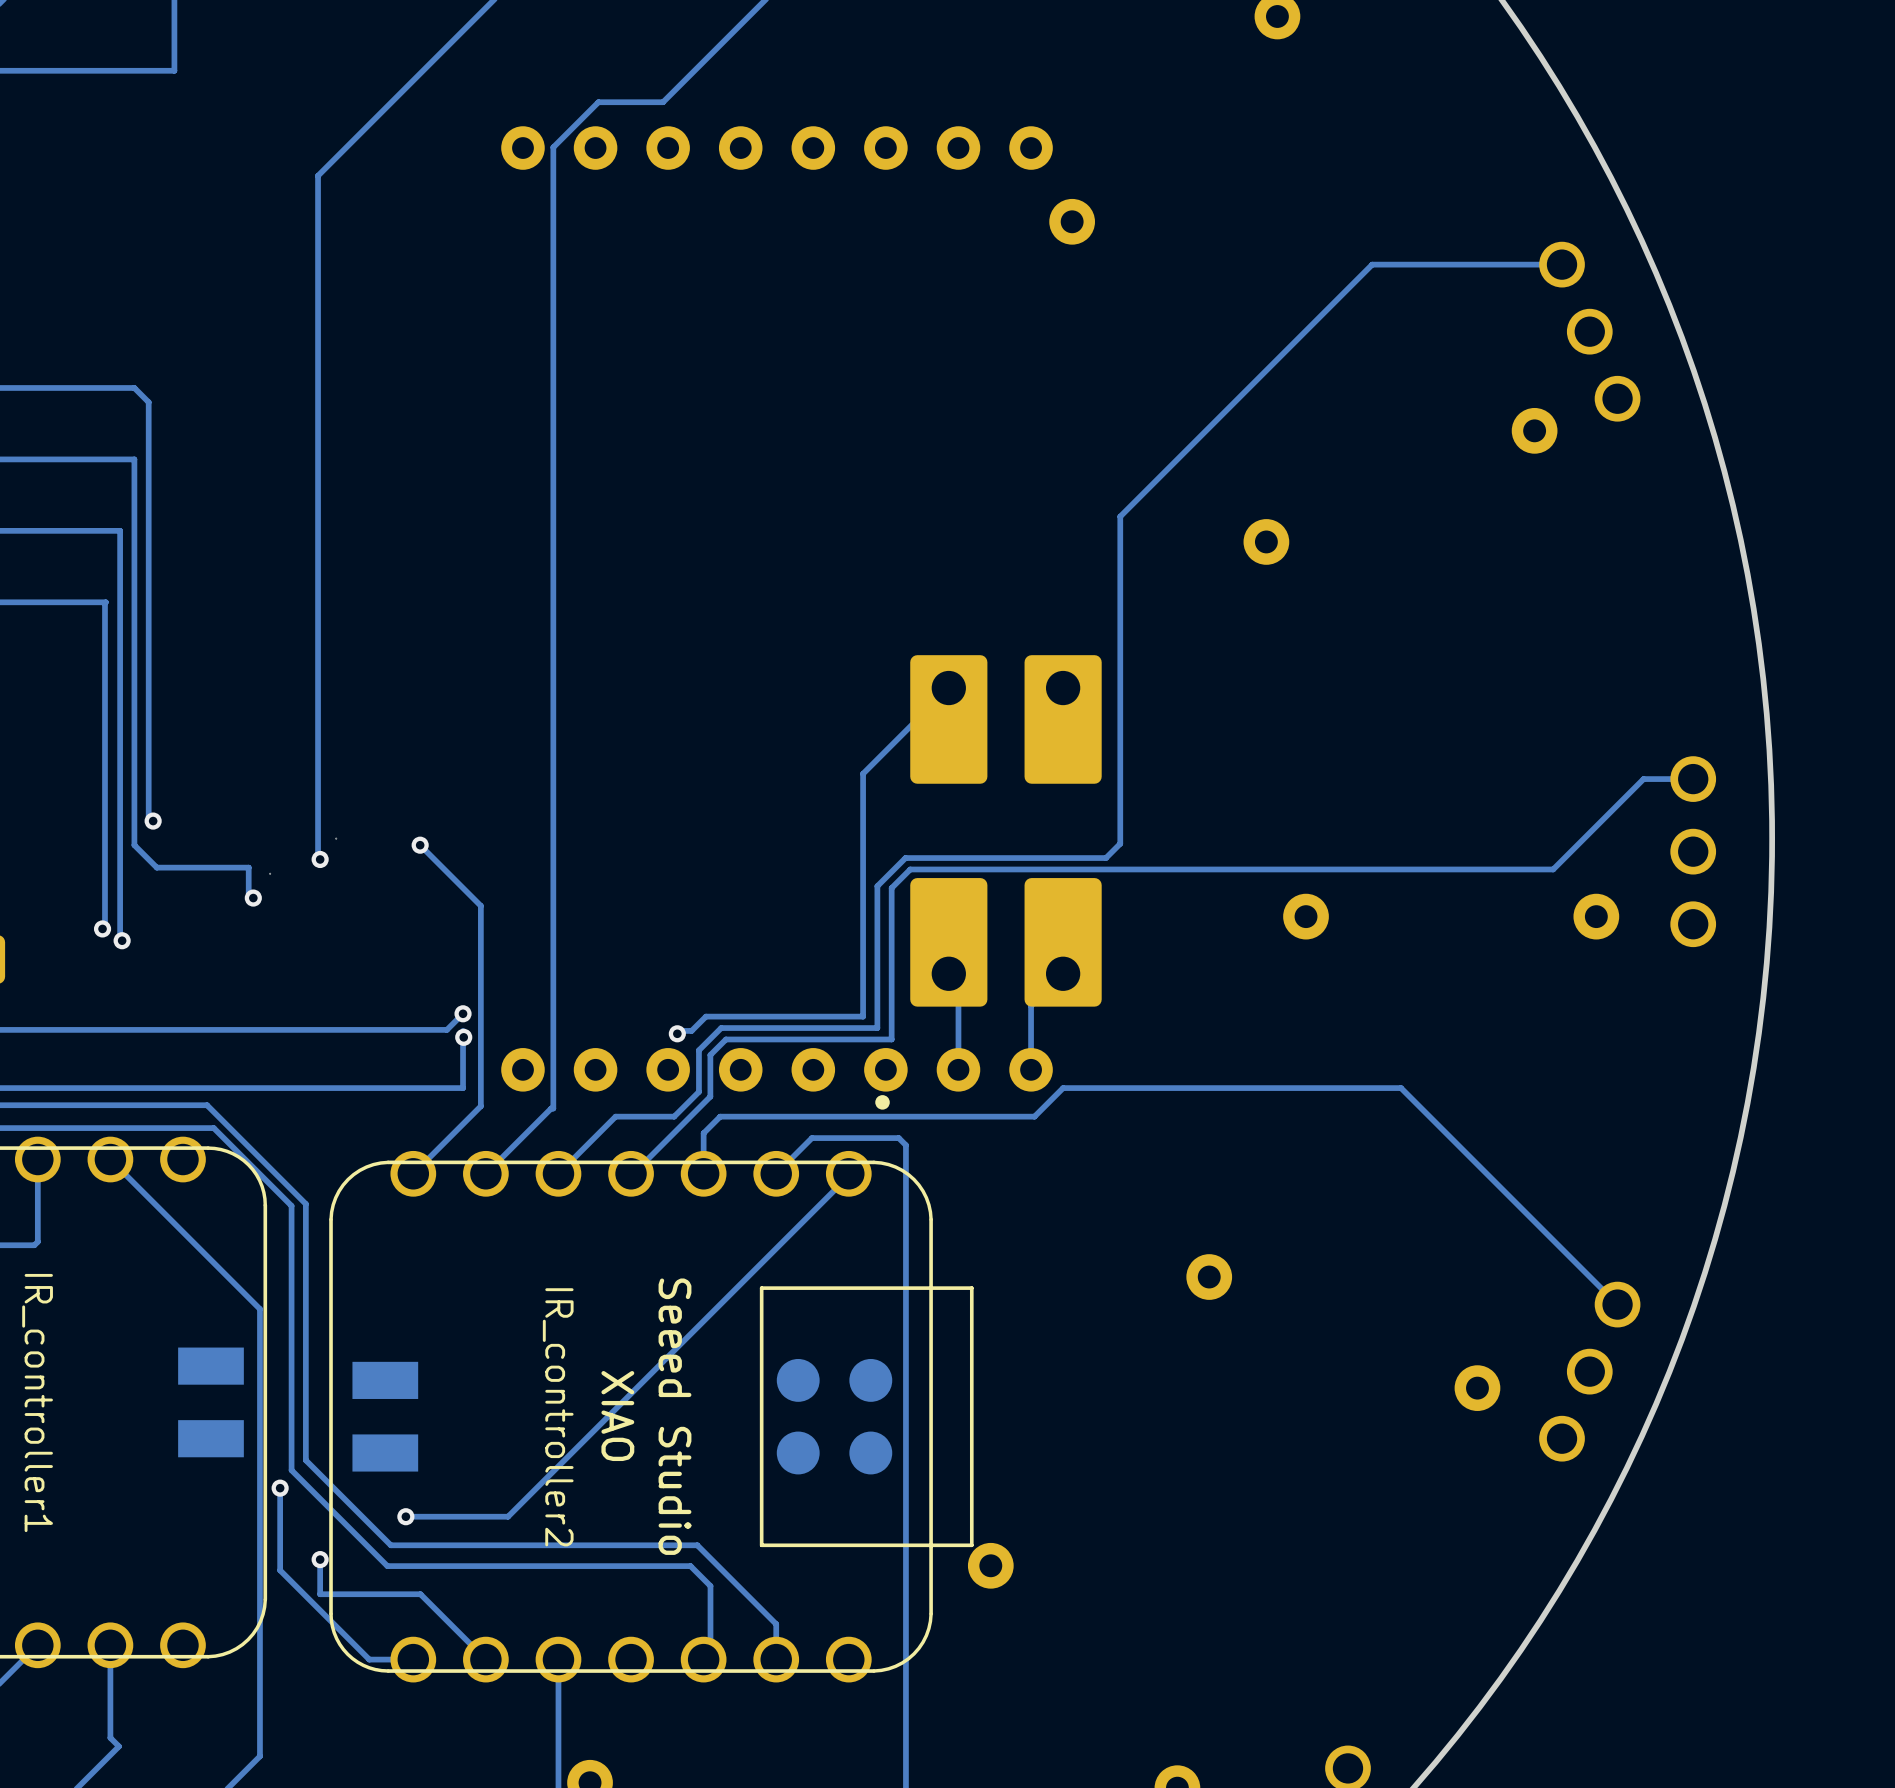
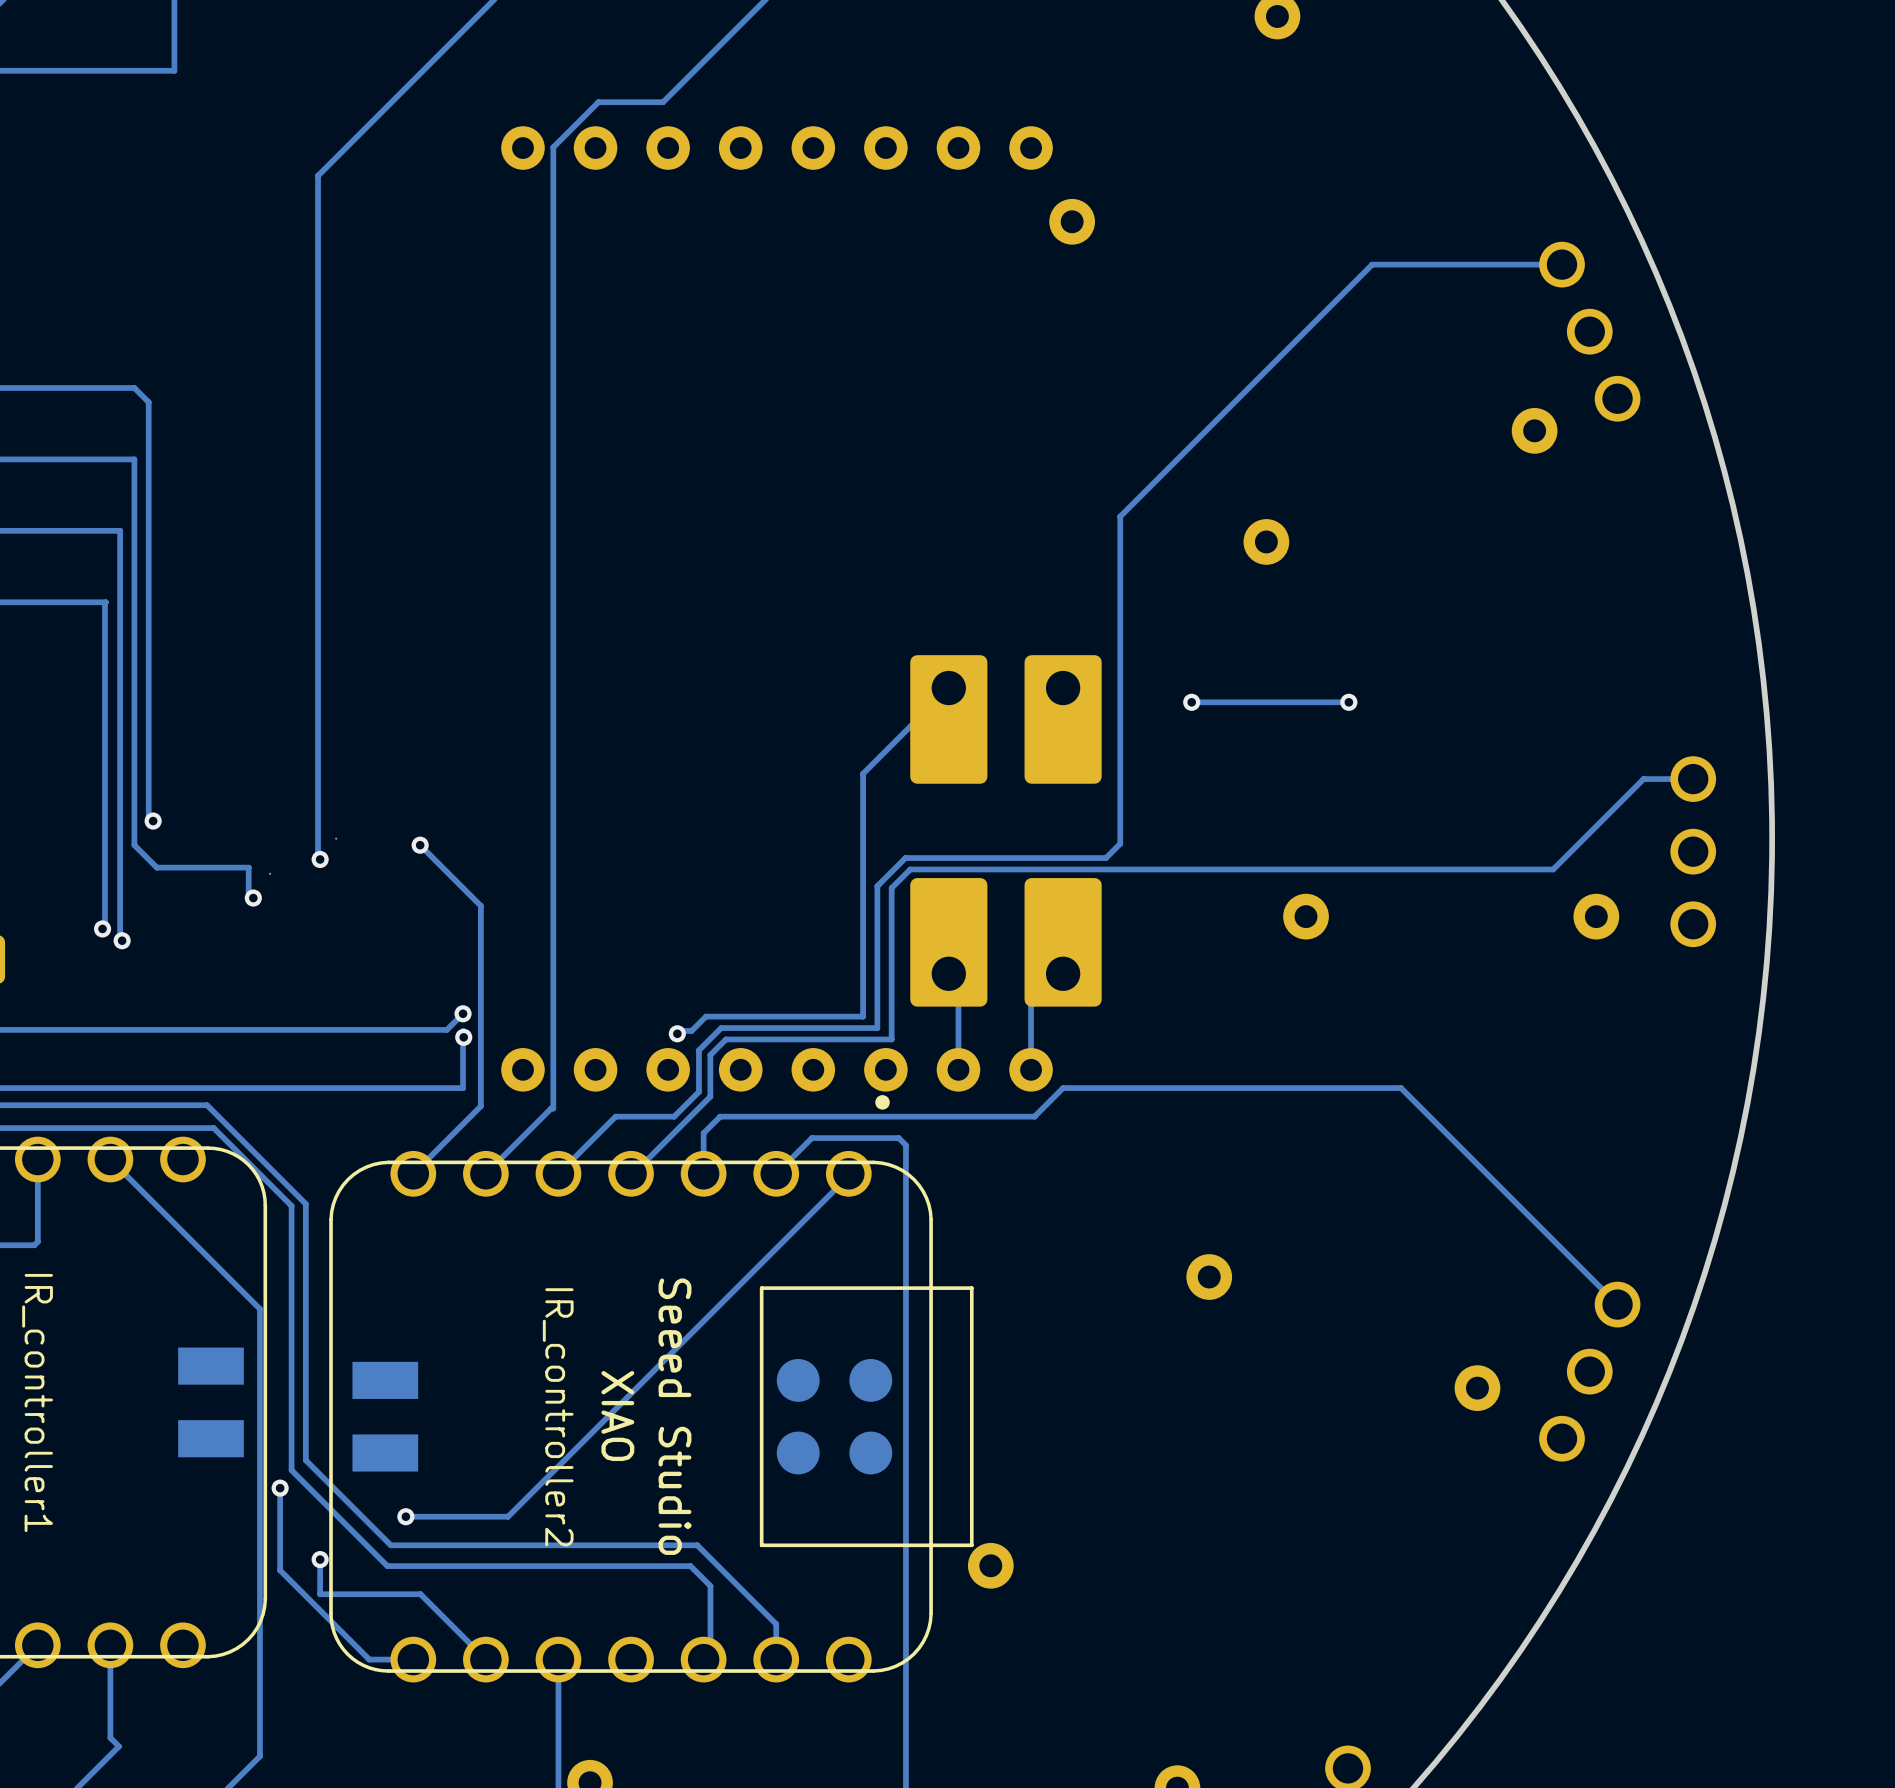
via: none -> (1191, 702)
track: none -> (1348, 702) (1191, 702)
via: none -> (1348, 702)

